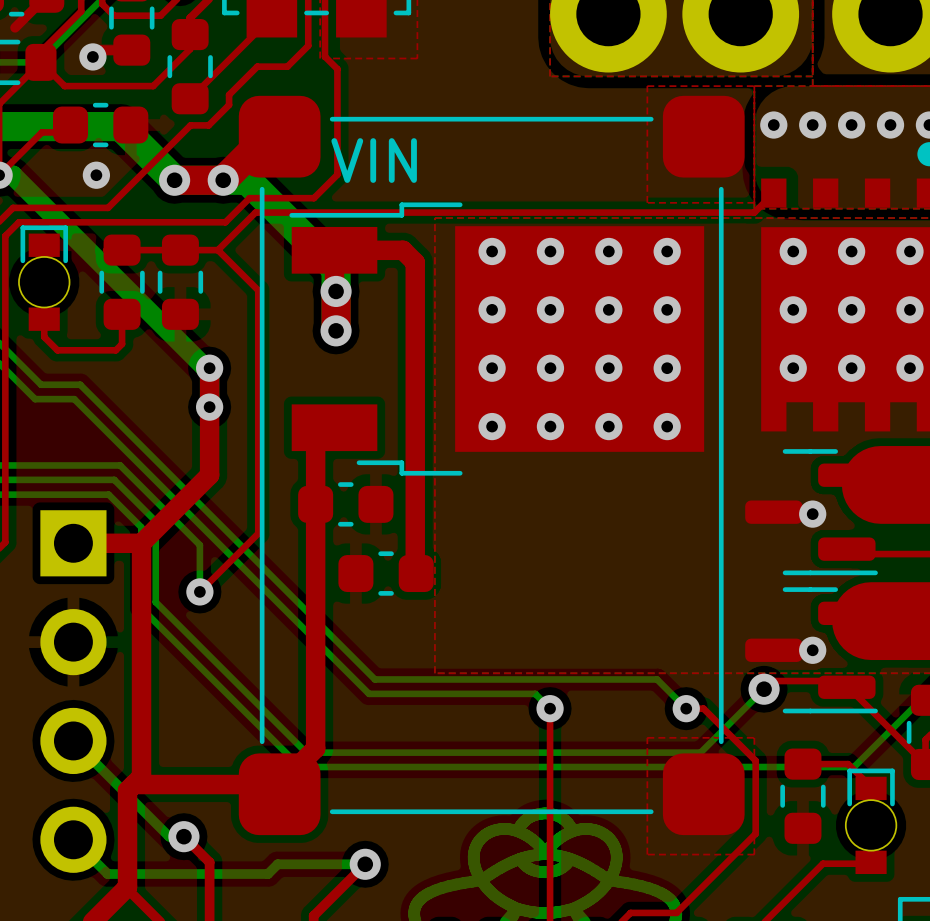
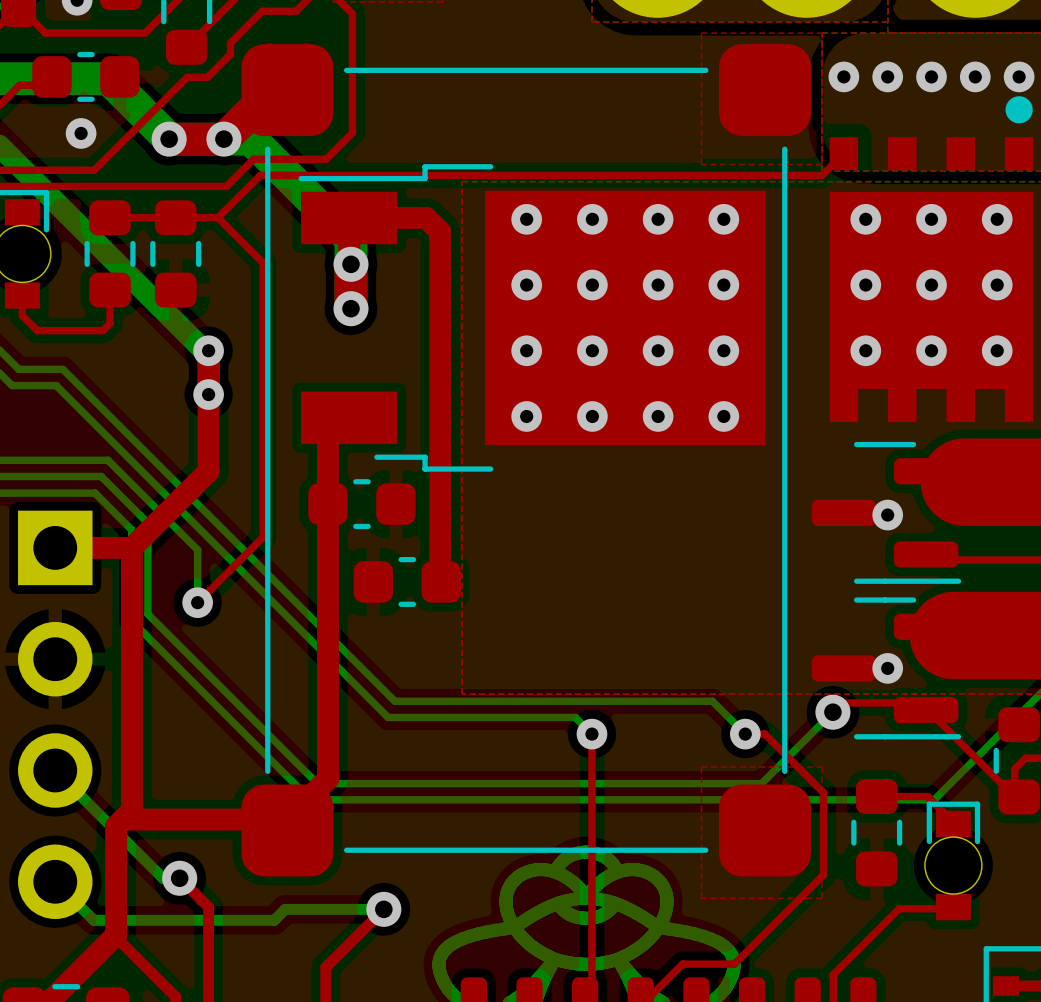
part text: VIN (374, 160) -> none

